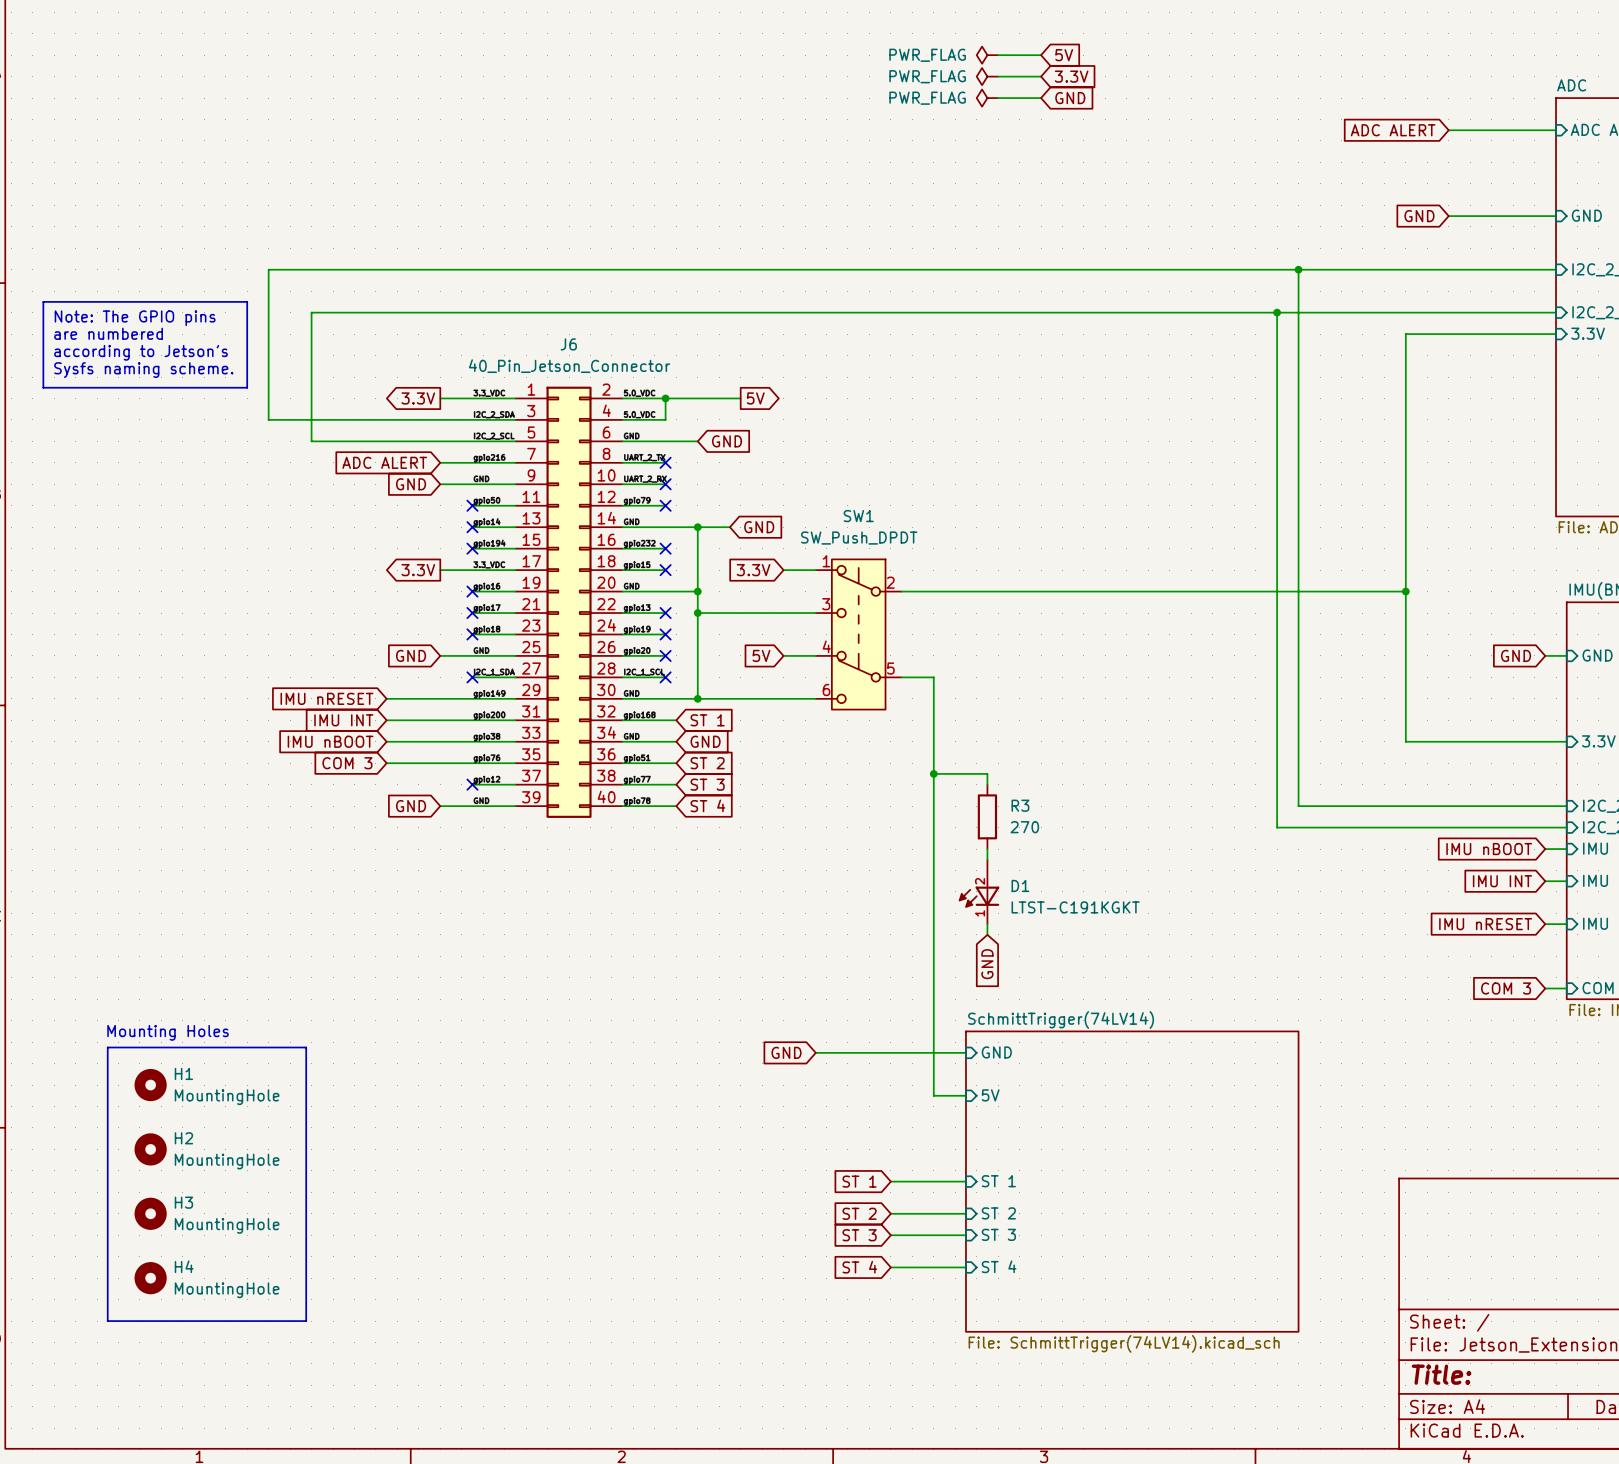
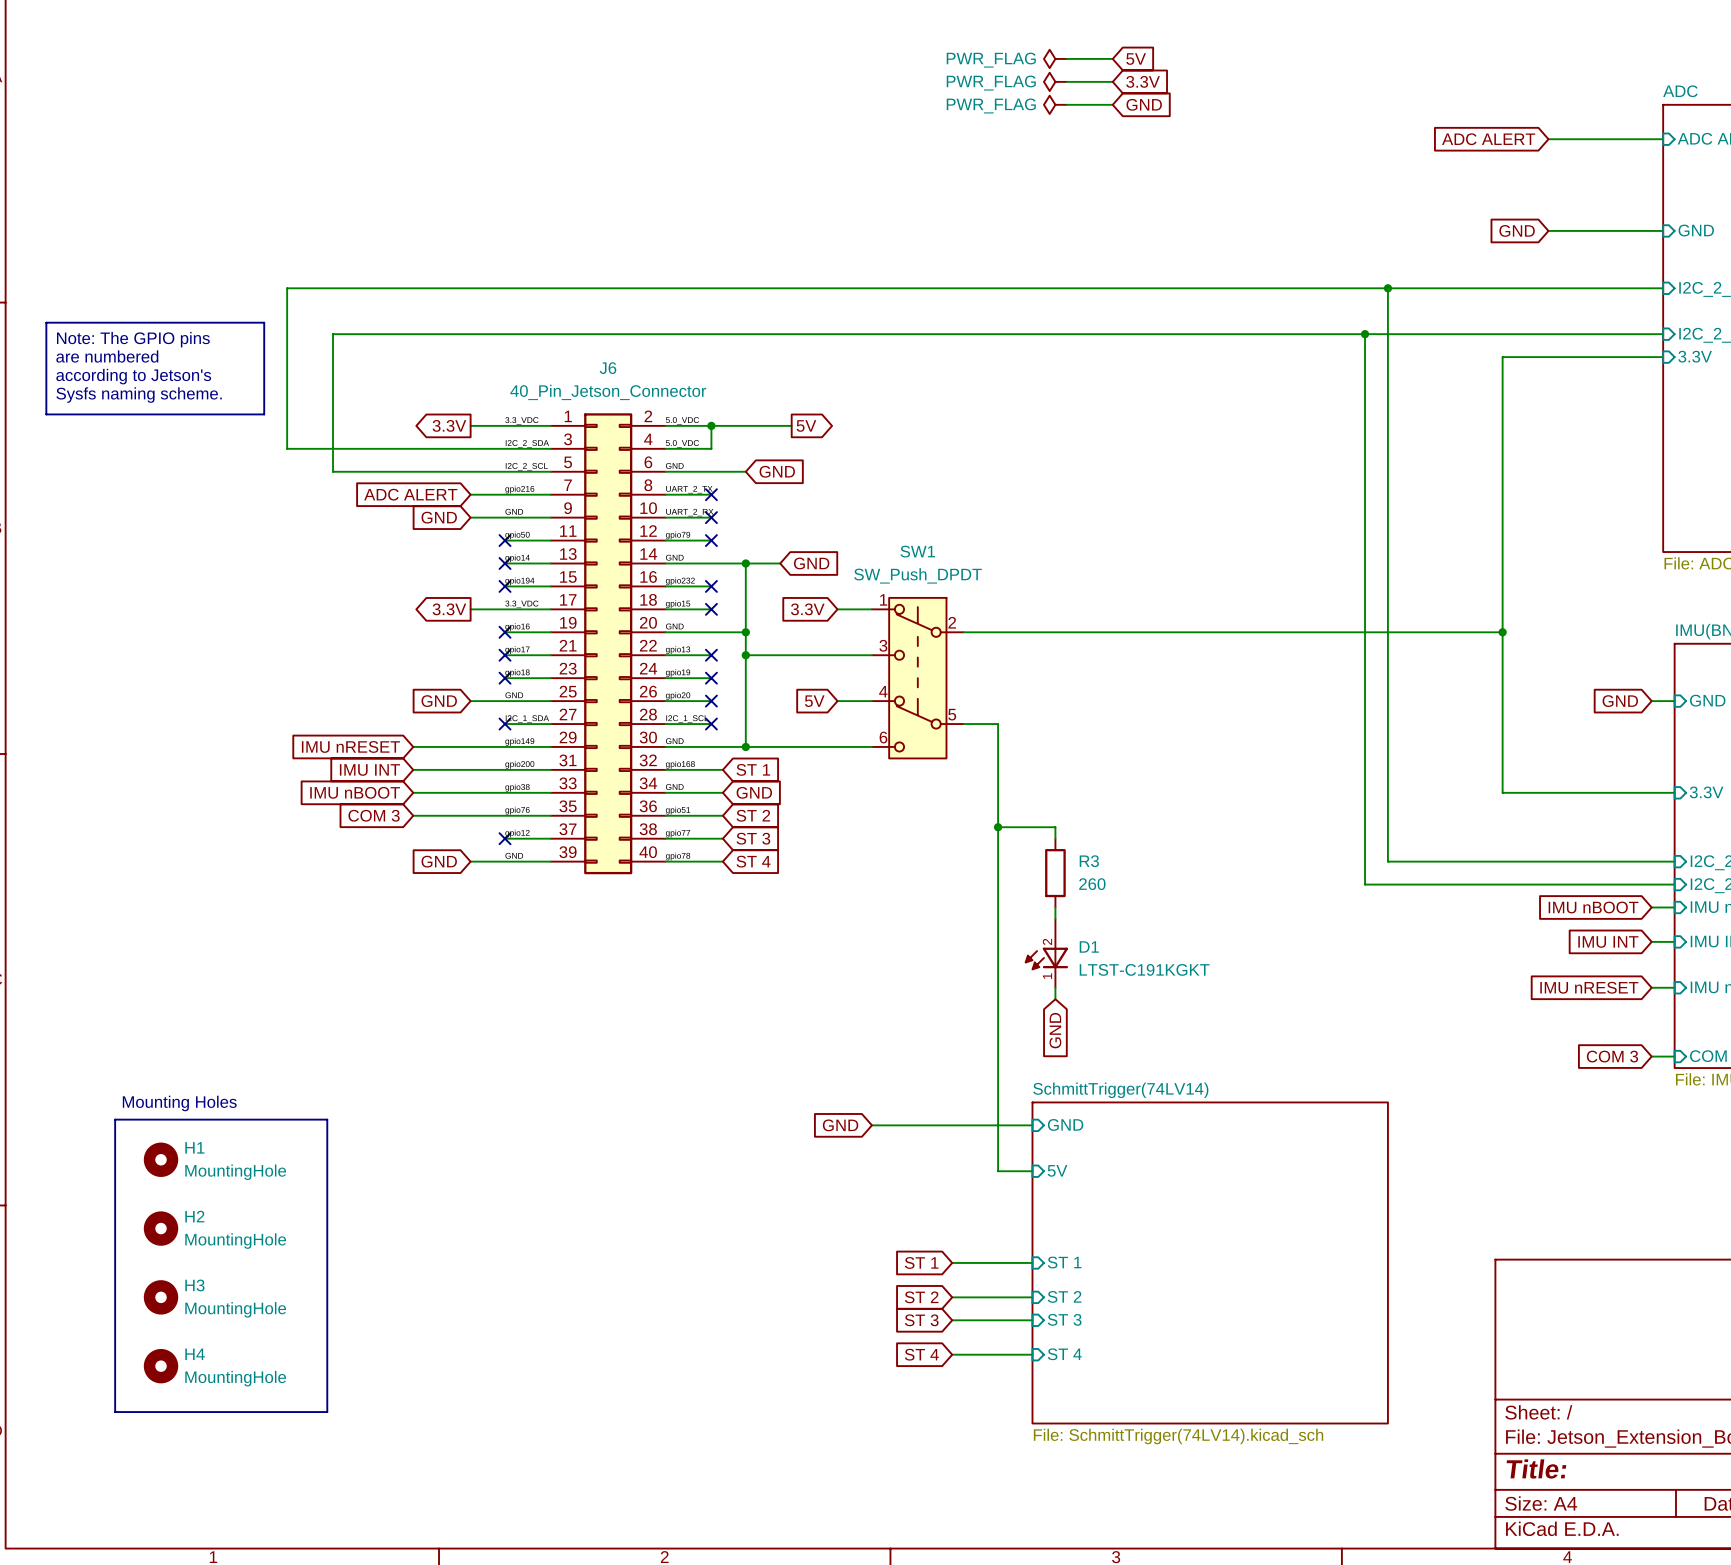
R3 value: 270 (1024, 827) -> 260 (1092, 884)

